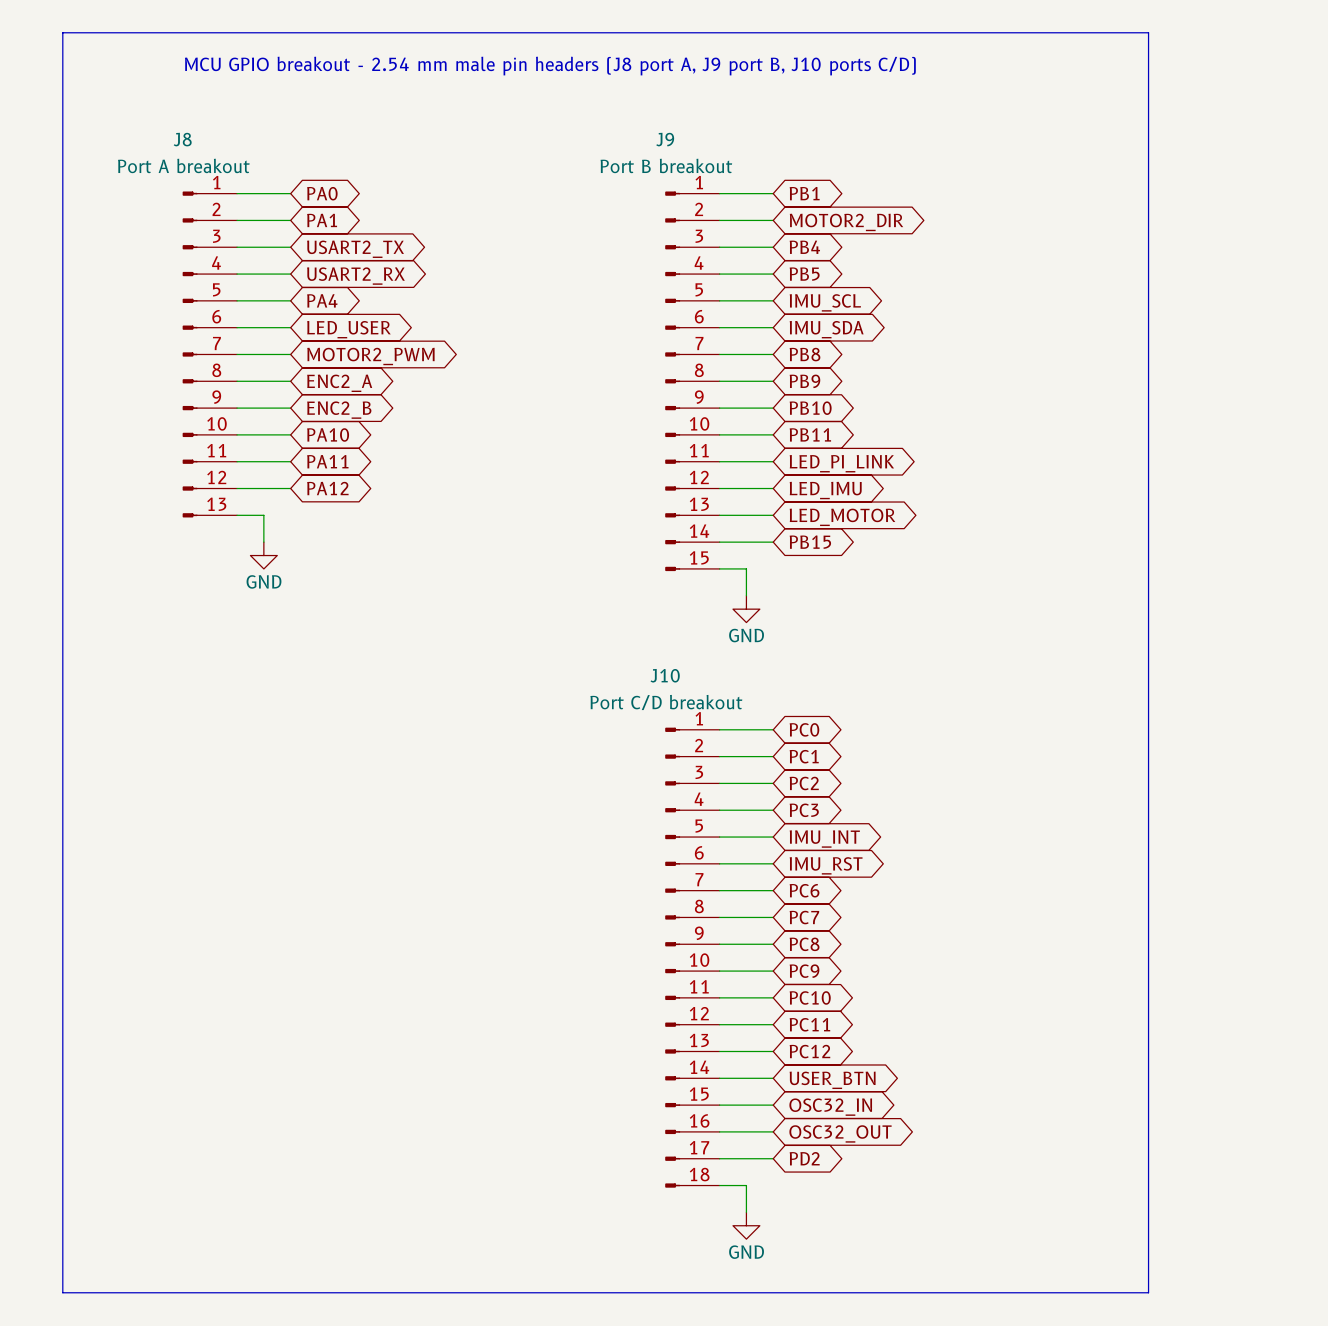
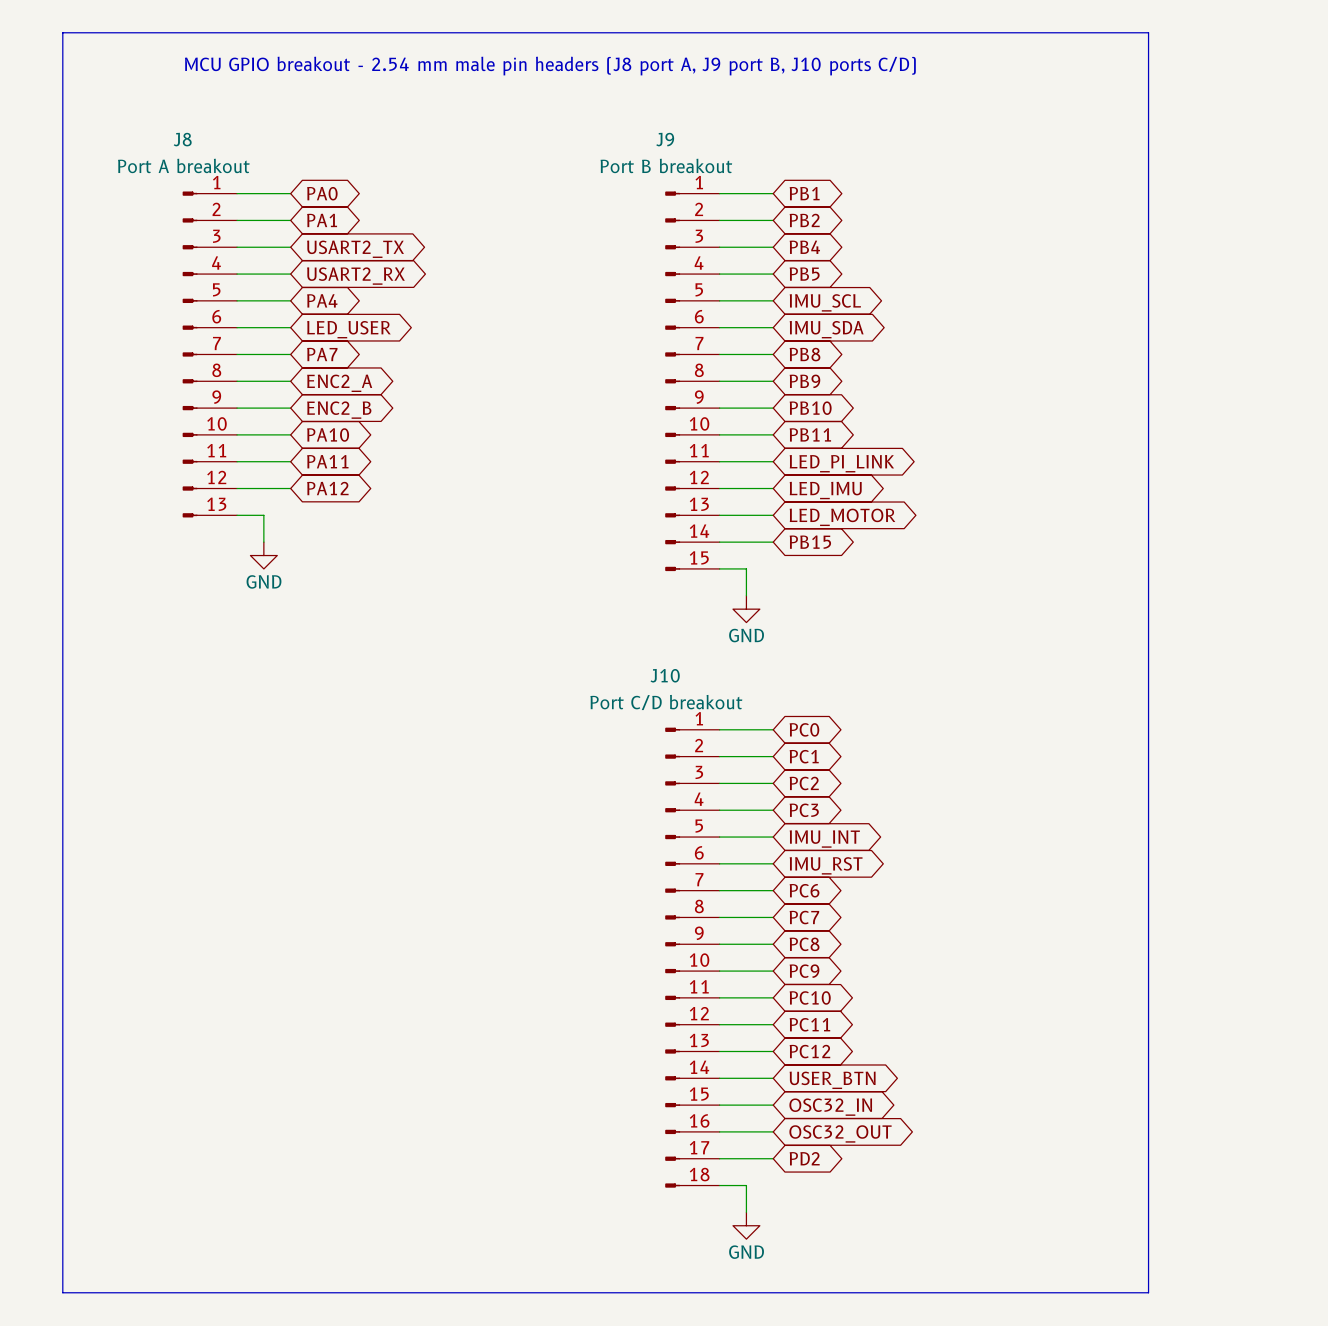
global label: MOTOR2_DIR (846, 222) -> PB2 (804, 220)
global label: MOTOR2_PWM (370, 356) -> PA7 (322, 354)

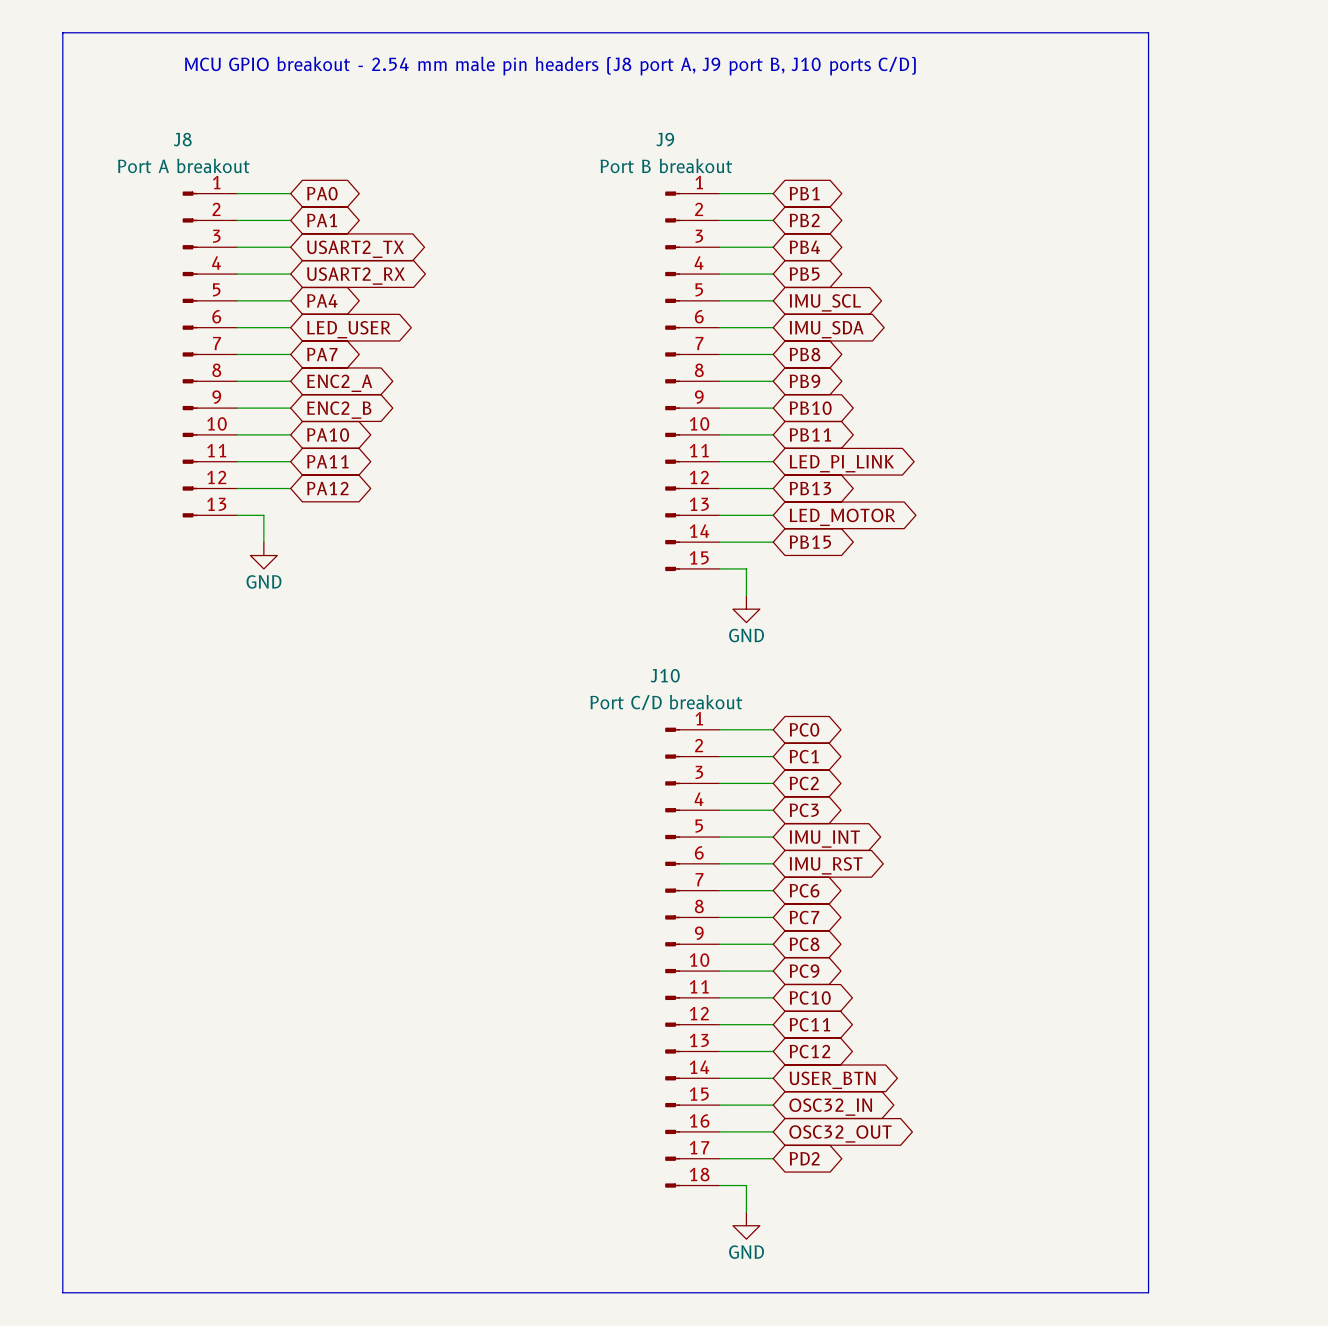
global label: LED_IMU (825, 490) -> PB13 (810, 488)

